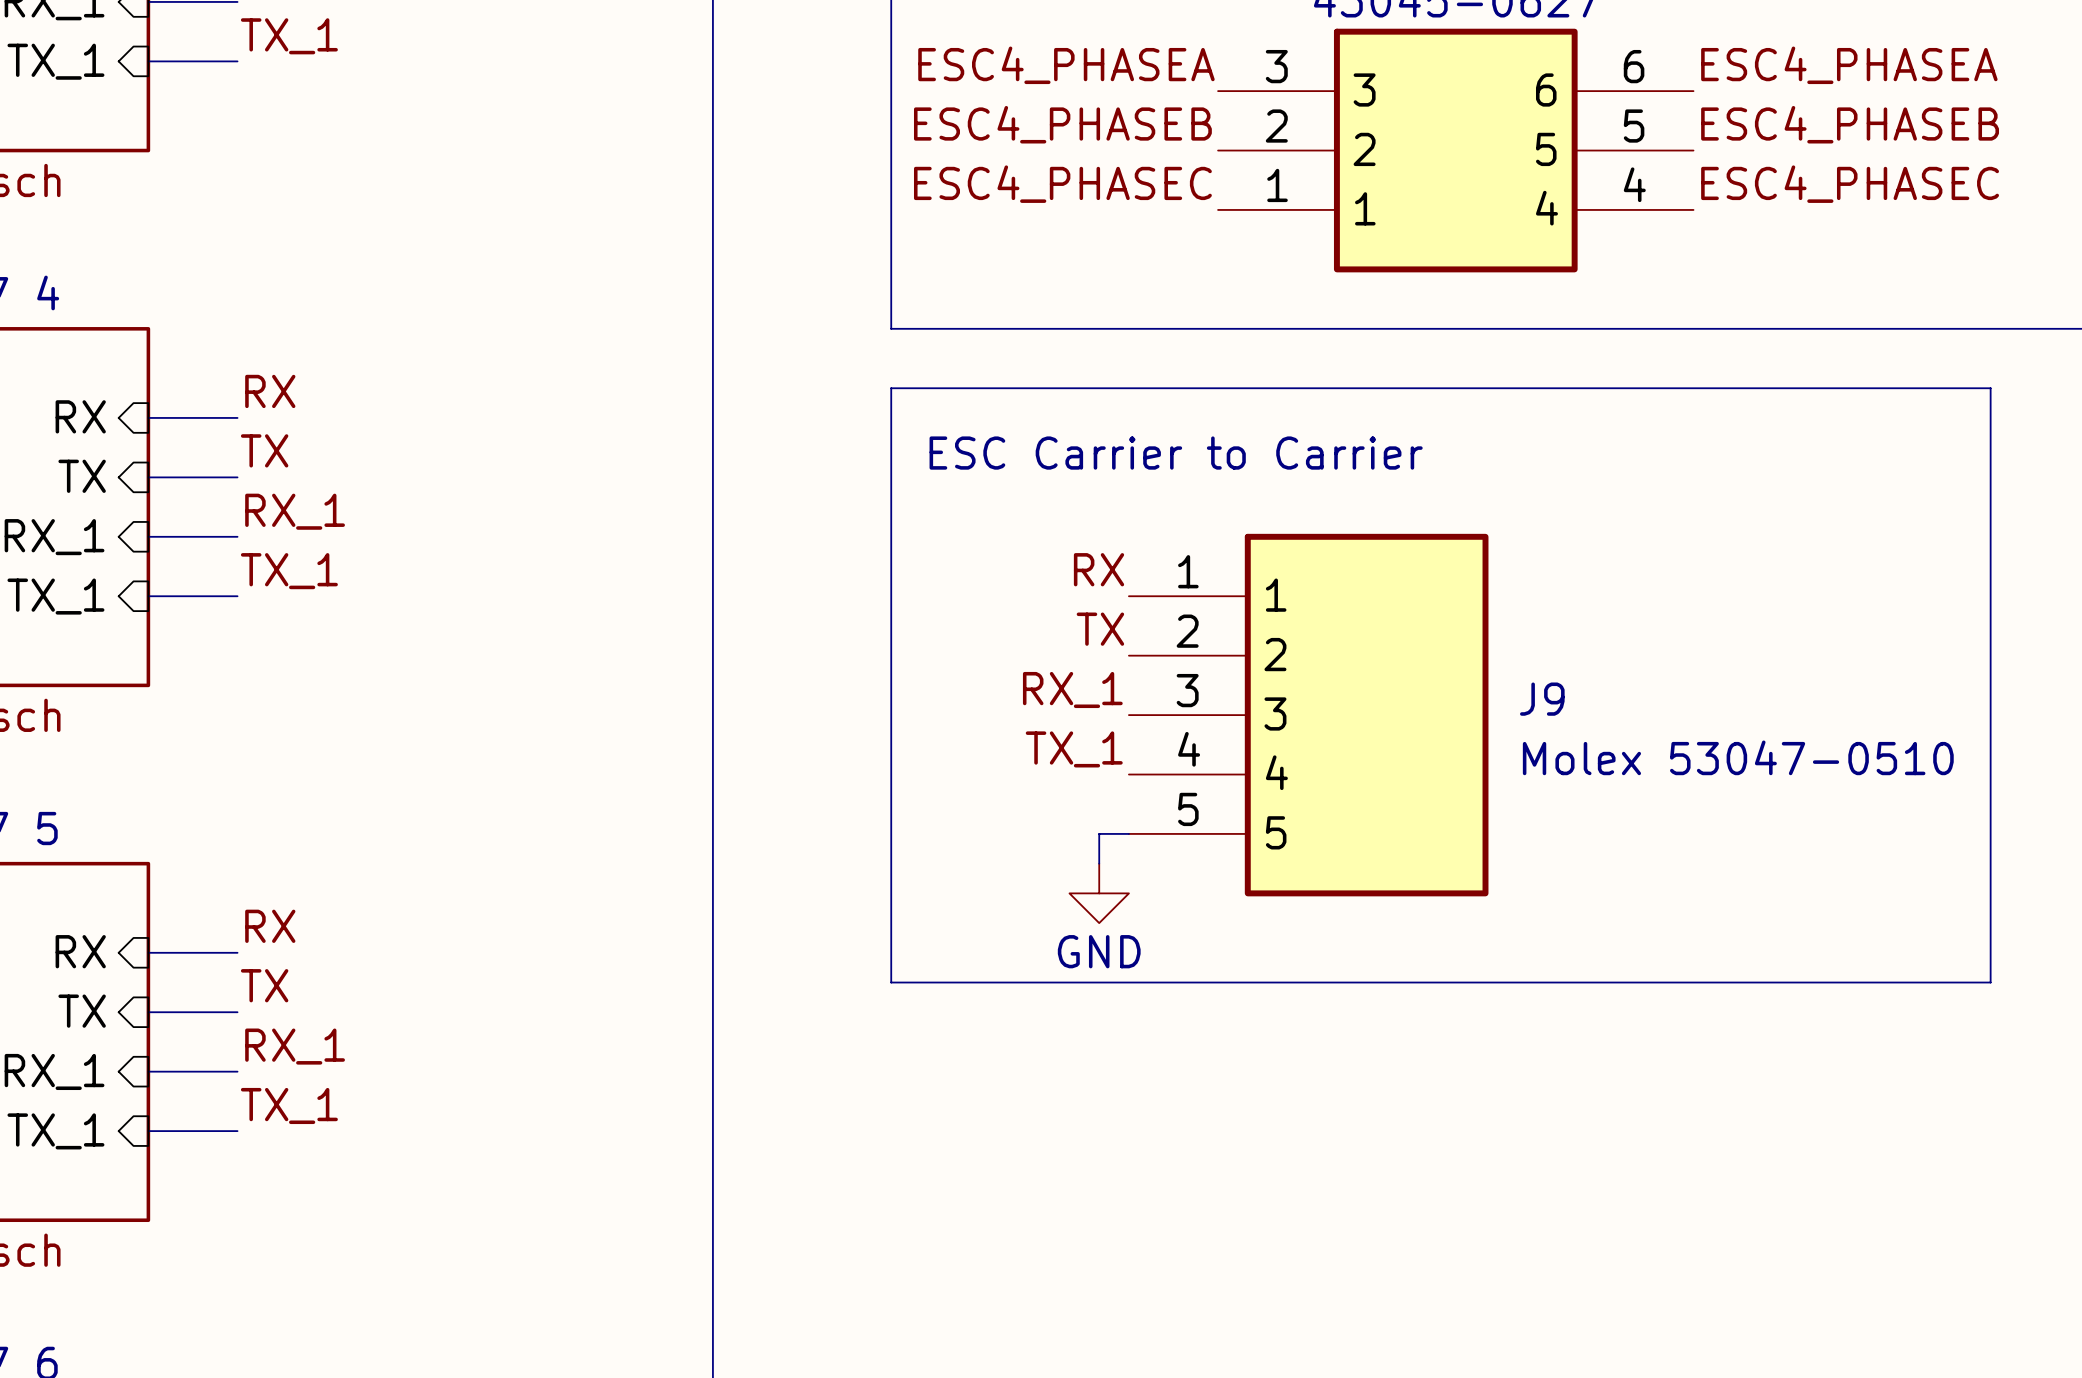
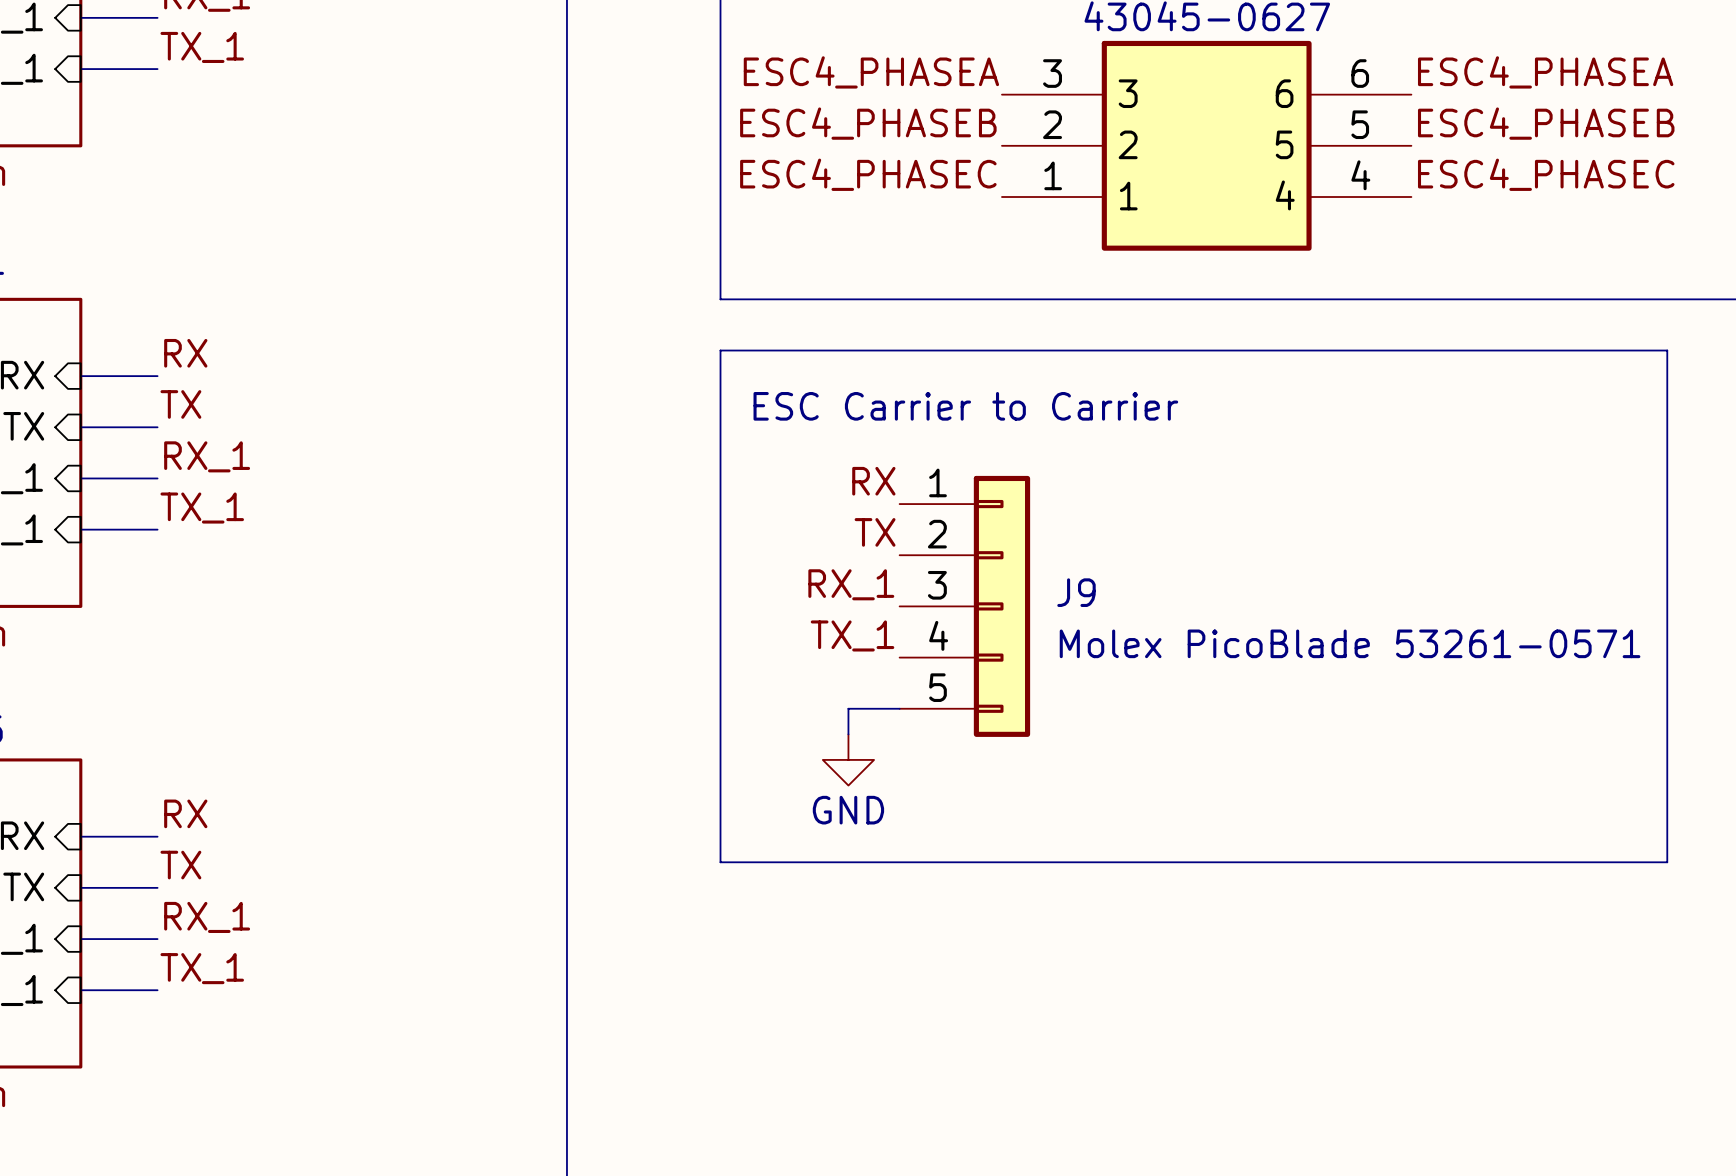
J9 symbol: [1128, 533, 1489, 897] -> [899, 475, 1031, 737]
label position: RX (1099, 569) -> RX (873, 481)
label position: TX (1100, 629) -> TX (875, 532)
label position: RX_1 (1072, 689) -> RX_1 (851, 584)
J9 name position: J9 (1542, 699) -> J9 (1076, 592)
label position: TX_1 (1074, 749) -> TX_1 (852, 635)
J9 value: Molex 53047-0510 (1738, 757) -> Molex PicoBlade 53261-0571 (1350, 643)
wire: none -> (899, 708) (848, 708) (848, 734)
wire: (1128, 833) (1099, 833) (1099, 863) -> none
power symbol position: GND (1099, 893) -> GND (848, 759)

